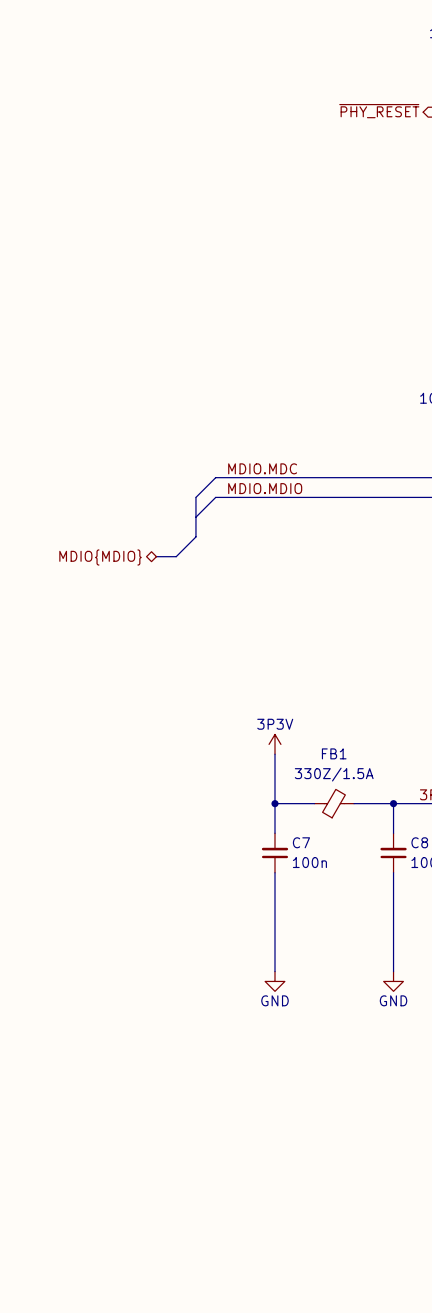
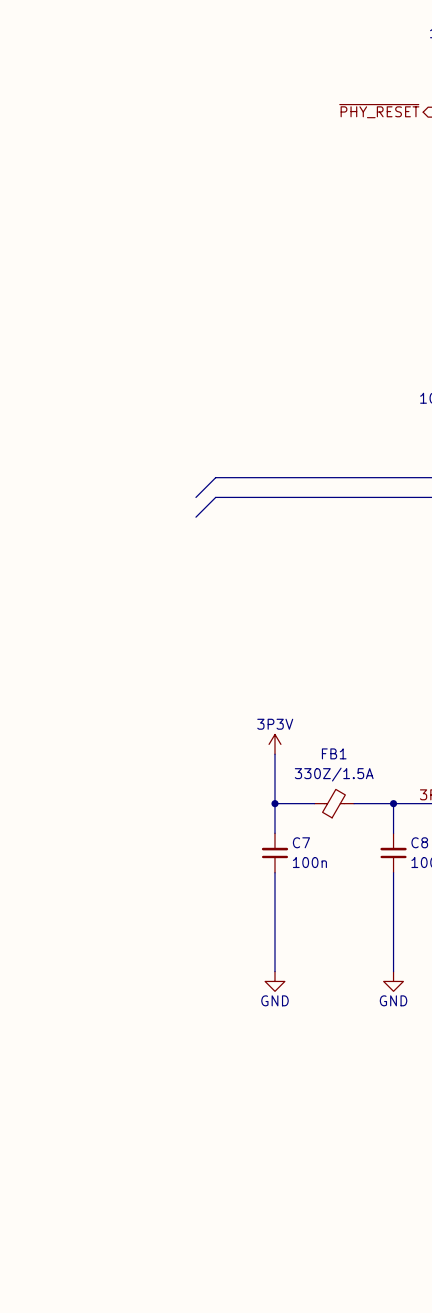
label: MDIO.MDC (262, 468) -> none
label: MDIO.MDIO (265, 488) -> none
bus: (195, 497) (195, 536) (176, 556) (156, 556) -> none
hierarchical label: MDIO{MDIO} (100, 557) -> none

